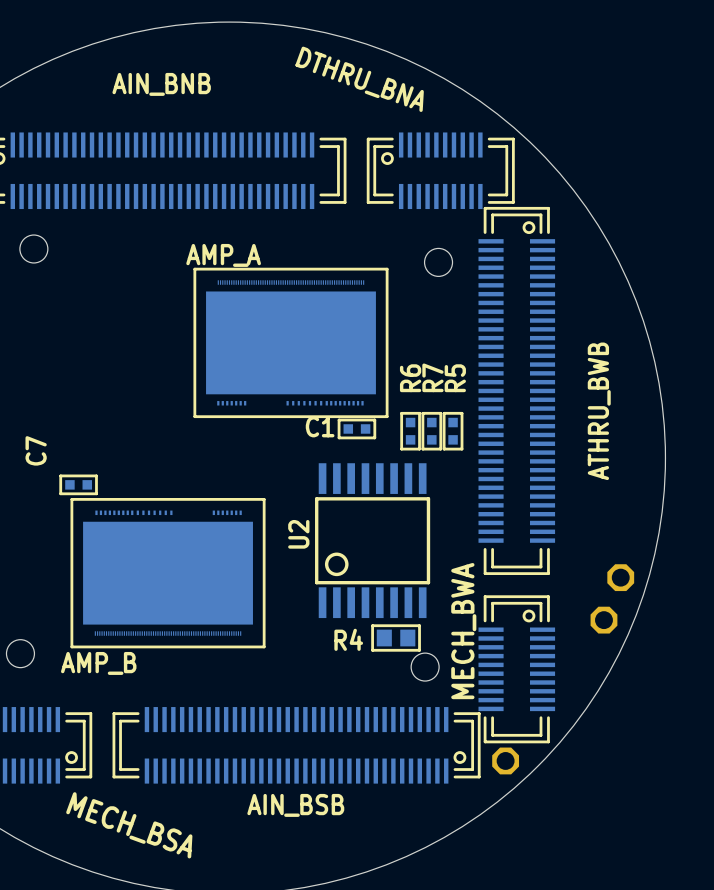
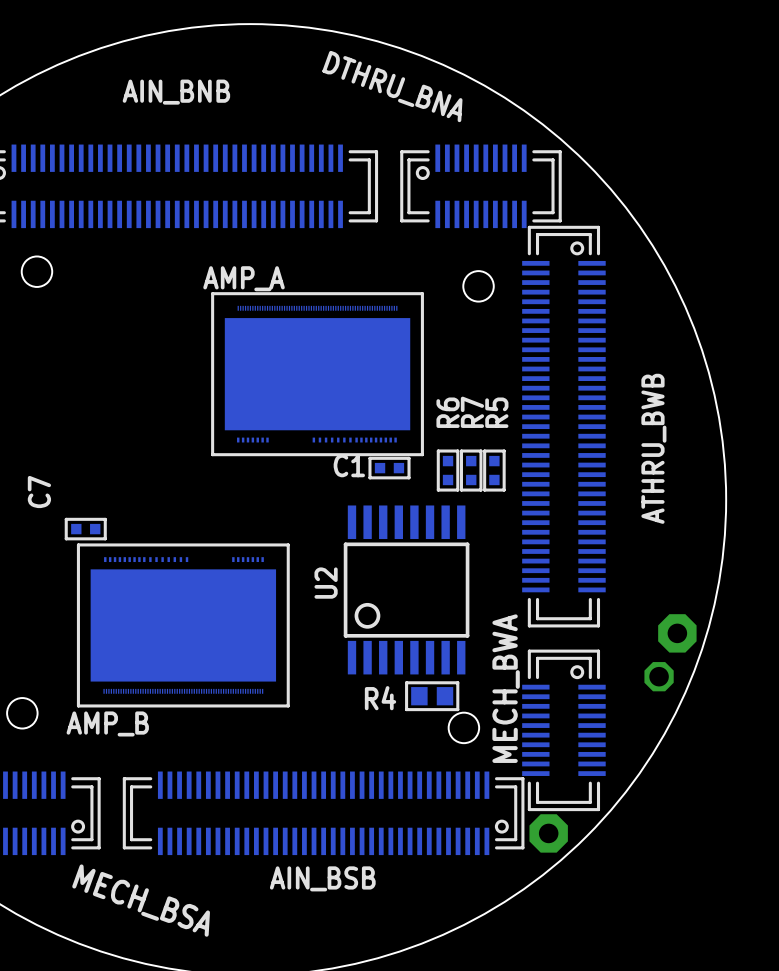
part footprint: [607, 564, 635, 592] -> [658, 614, 697, 653]
part footprint: [492, 747, 520, 775] -> [529, 814, 568, 853]

